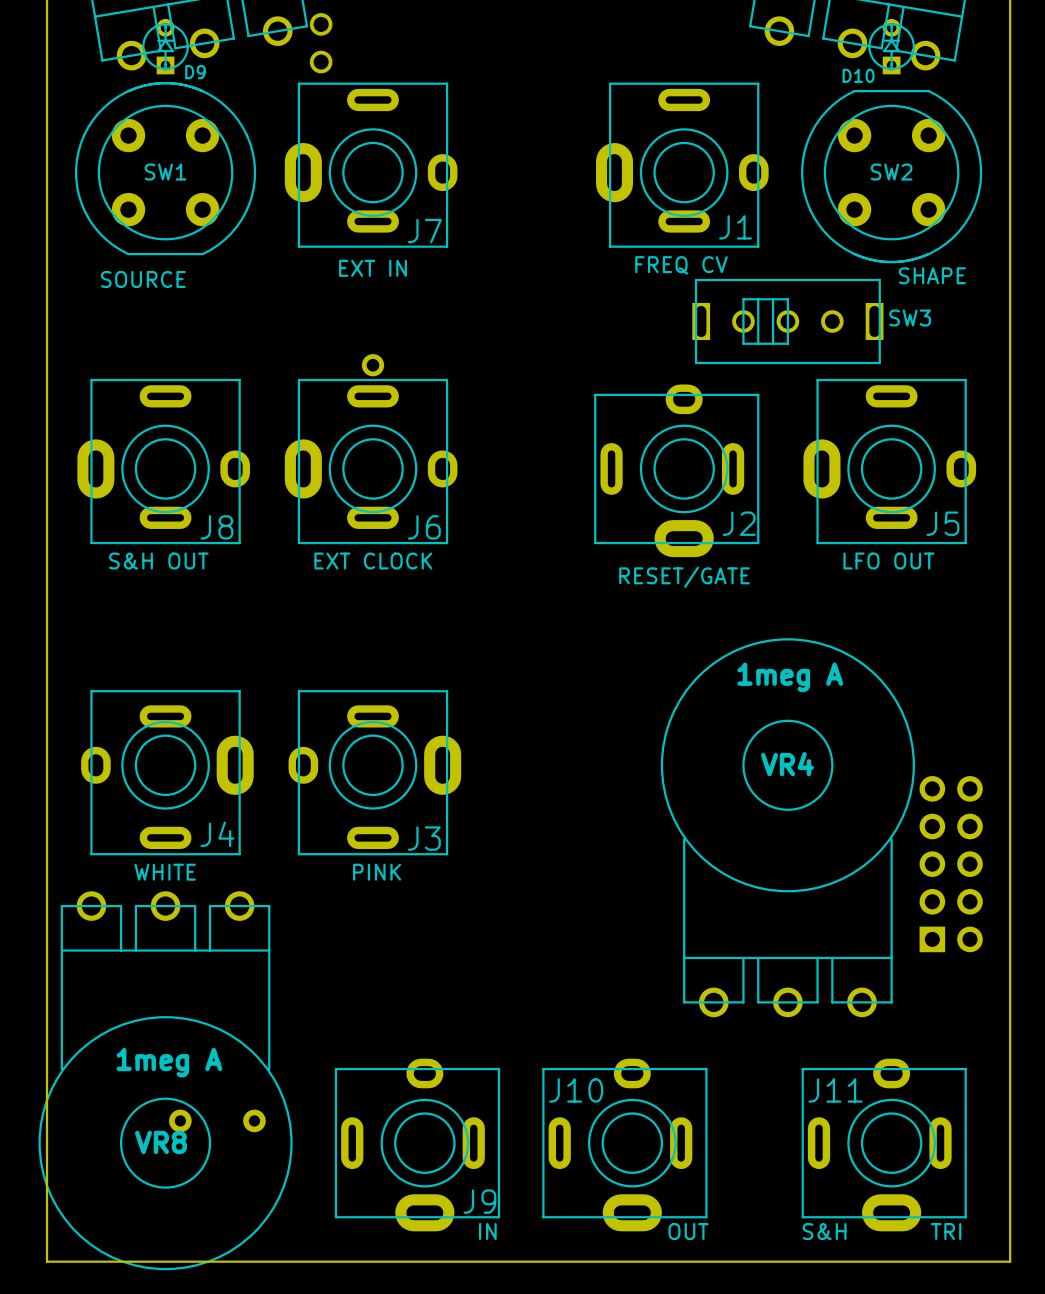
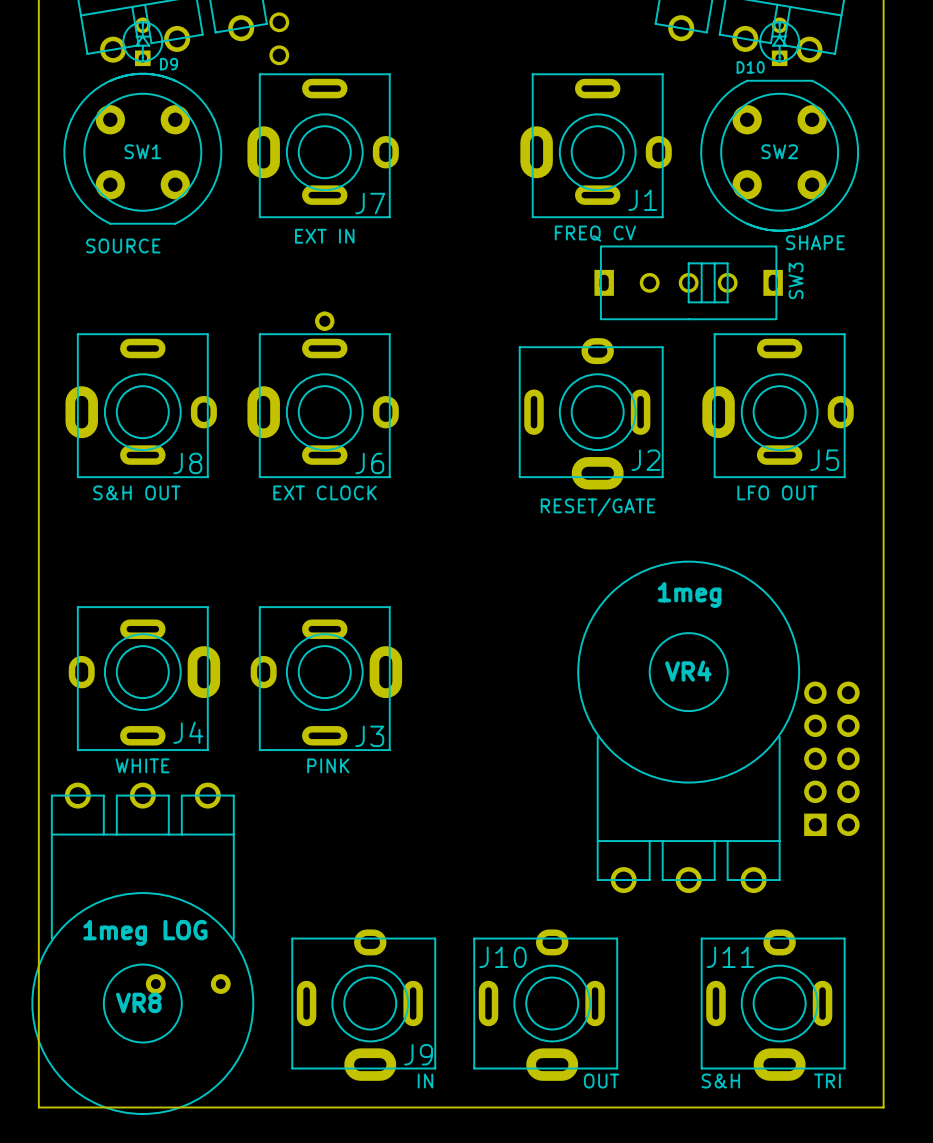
SW3 footprint: [692, 278, 884, 365] -> [594, 245, 783, 321]
VR4 value: 1meg A (790, 677) -> 1meg (689, 594)
VR8 value: 1meg A (169, 1062) -> 1meg LOG (145, 932)

